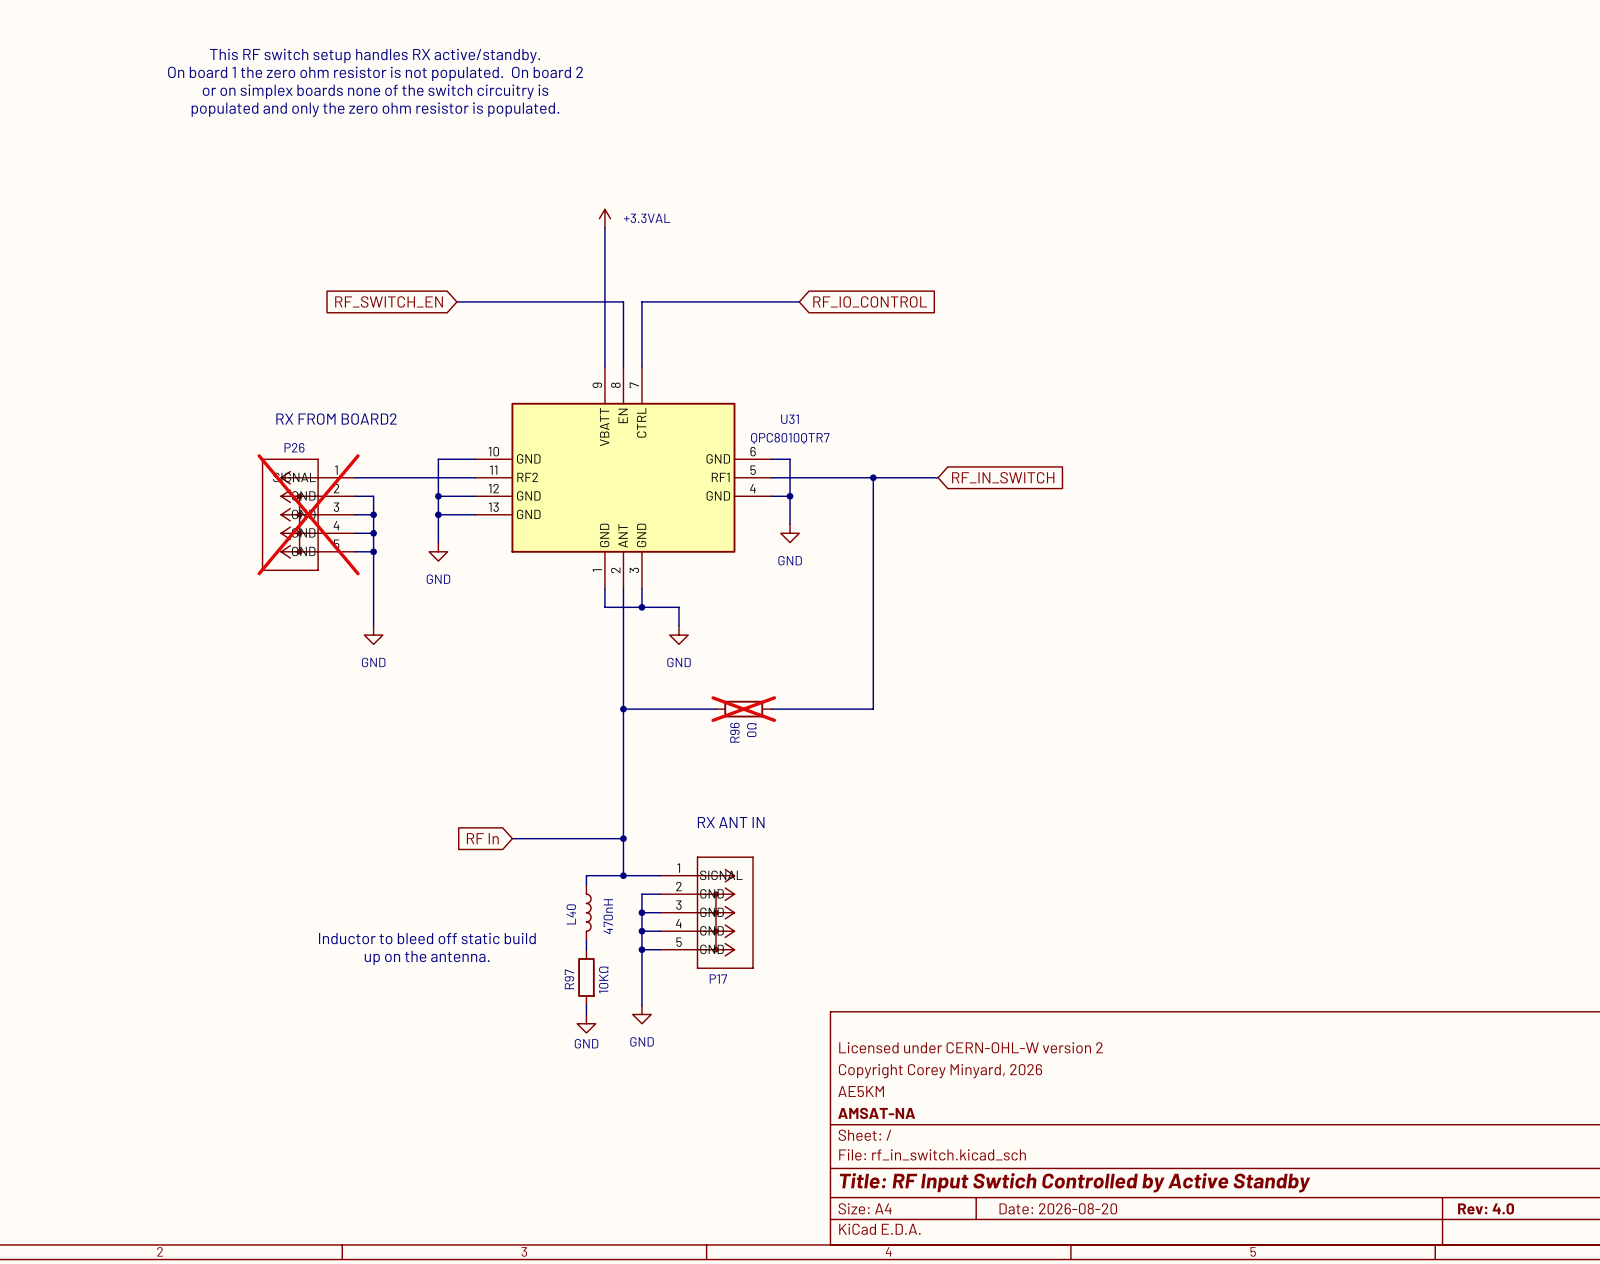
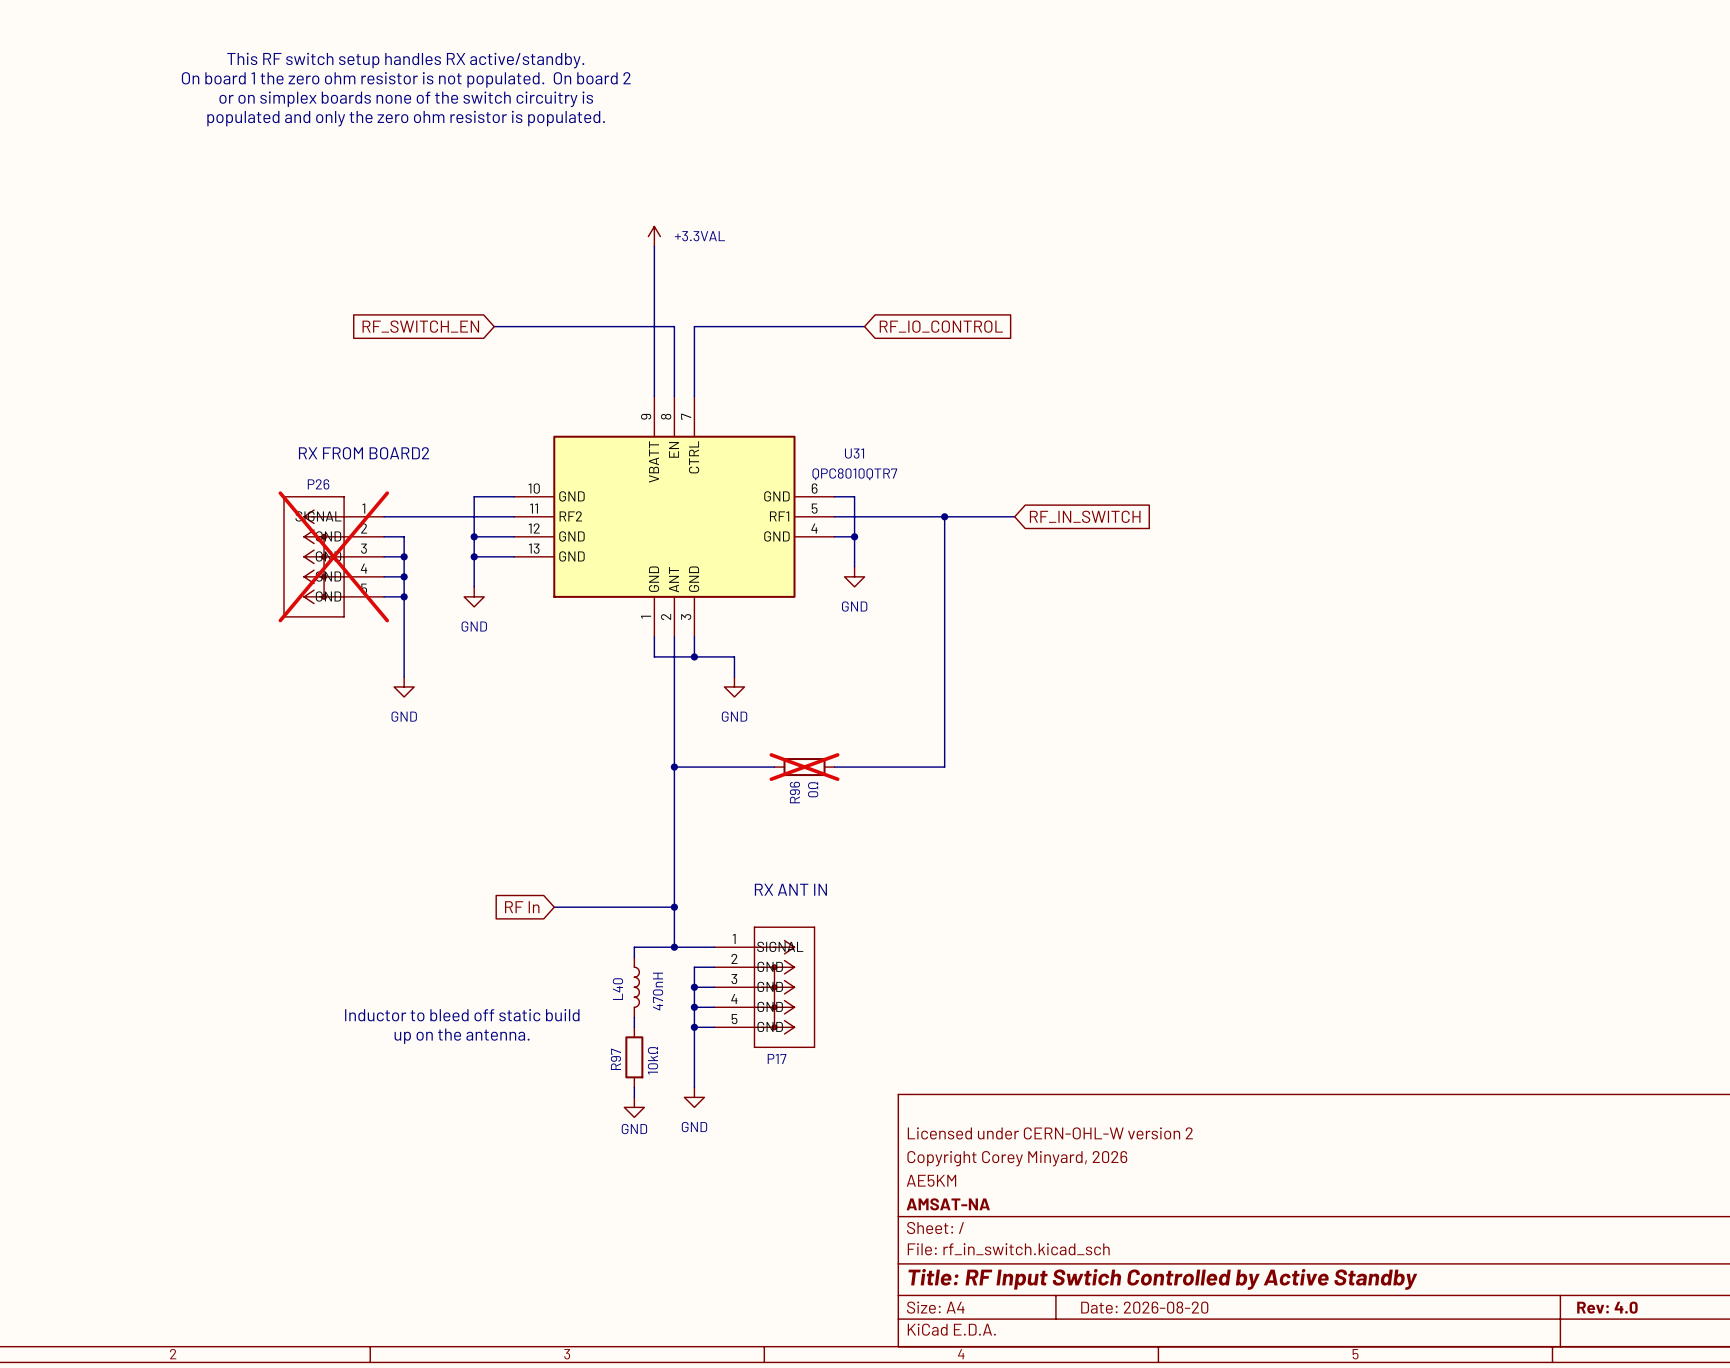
R97 value: 10KΩ (603, 979) -> 10kΩ (653, 1060)

